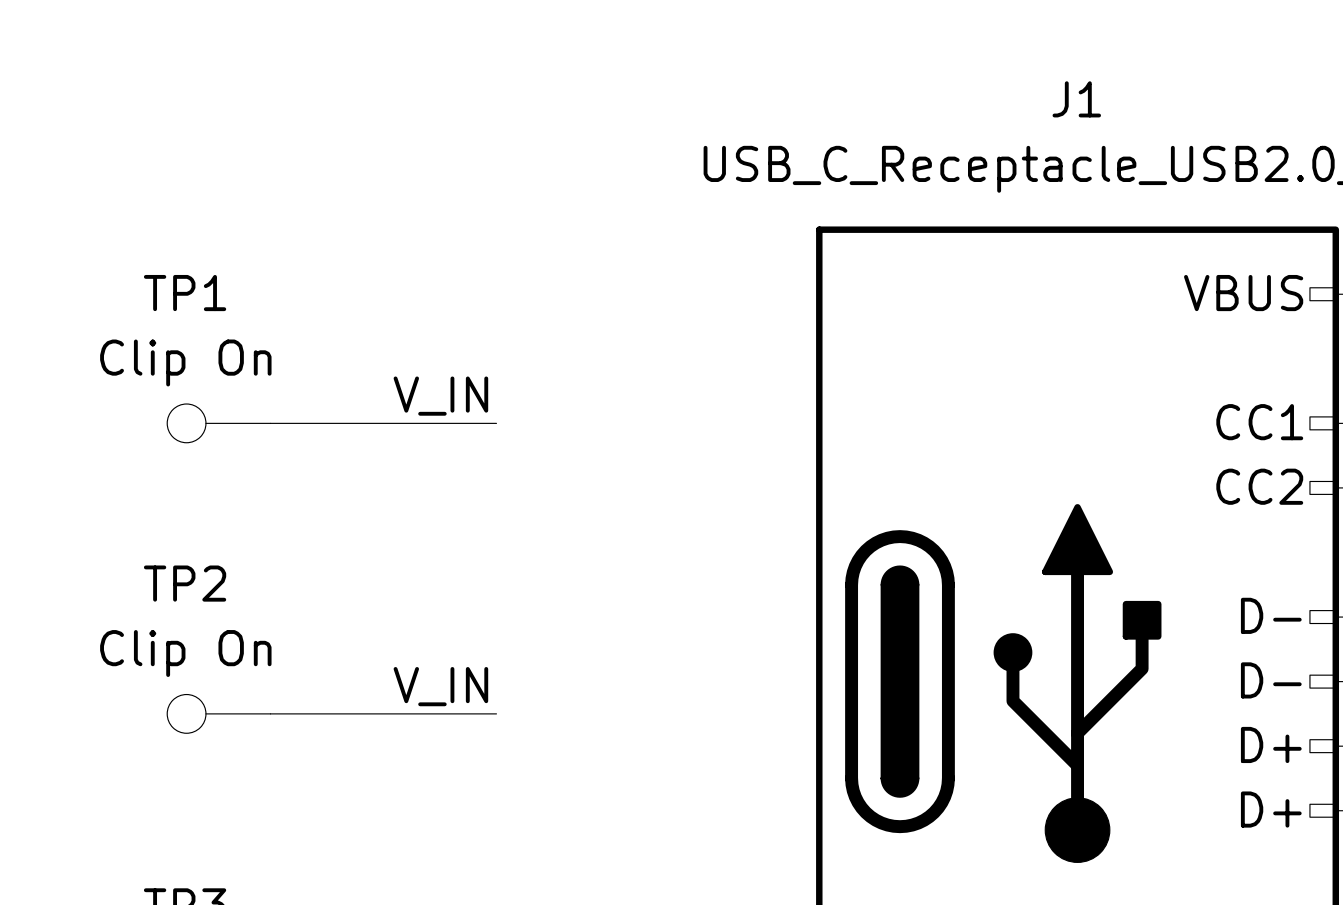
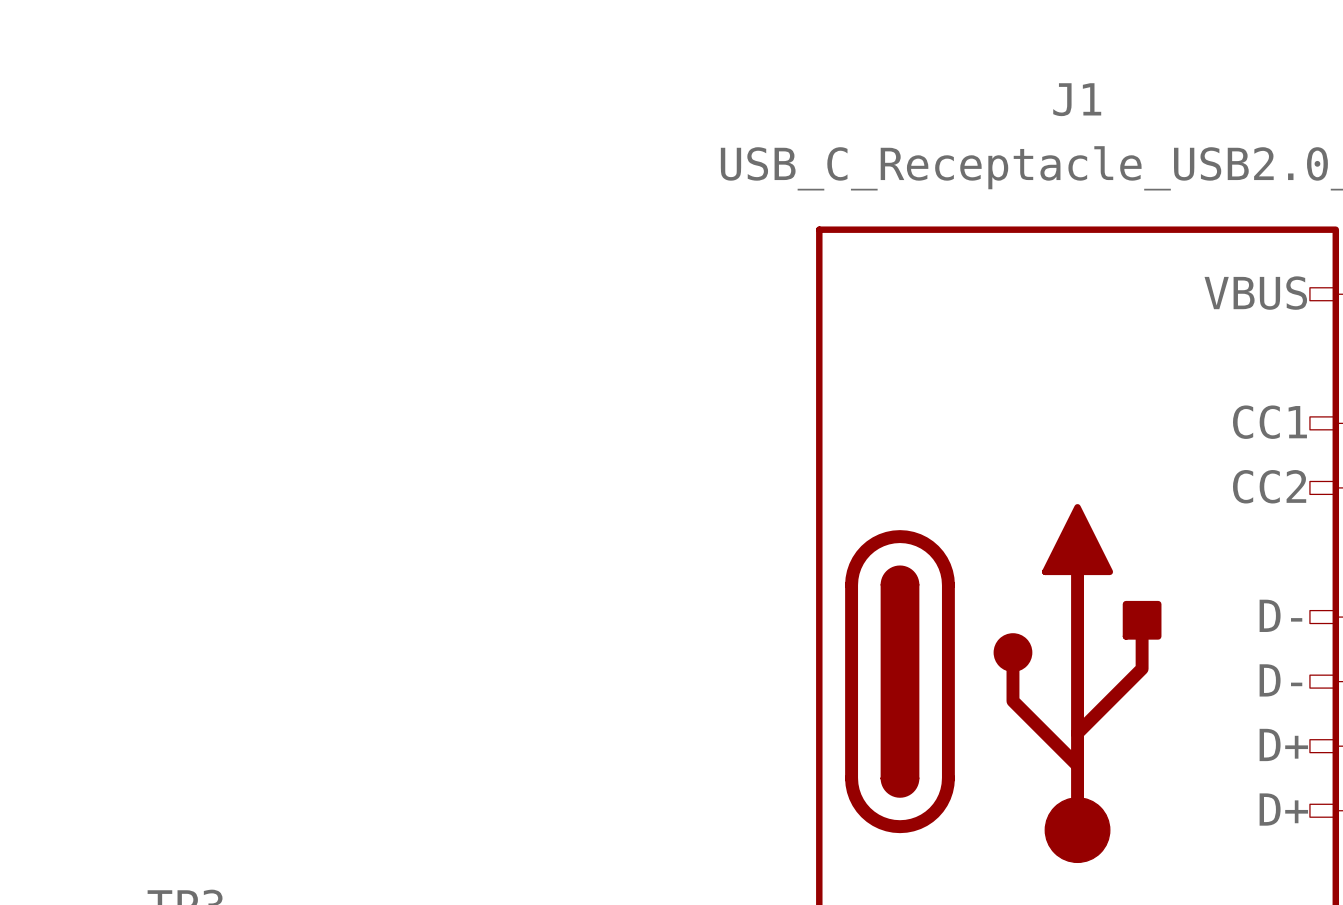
label: V_IN (440, 396) -> none
TP1: Clip On (218, 423) -> none
wire: (270, 423) (496, 423) -> none
label: V_IN (440, 686) -> none
TP2: Clip On (218, 713) -> none
wire: (270, 713) (496, 713) -> none

